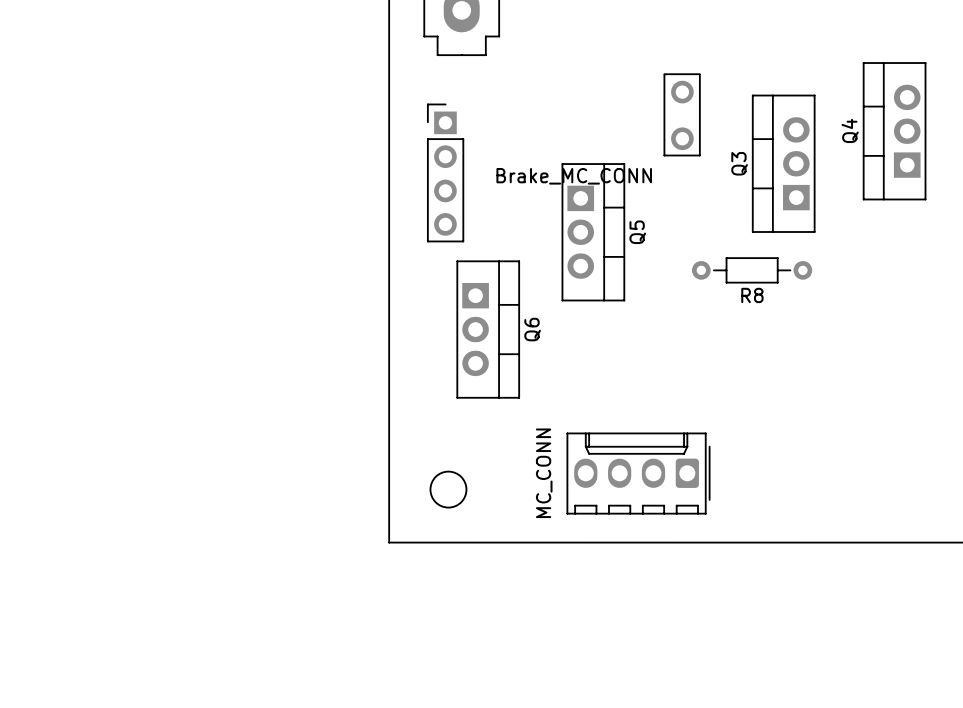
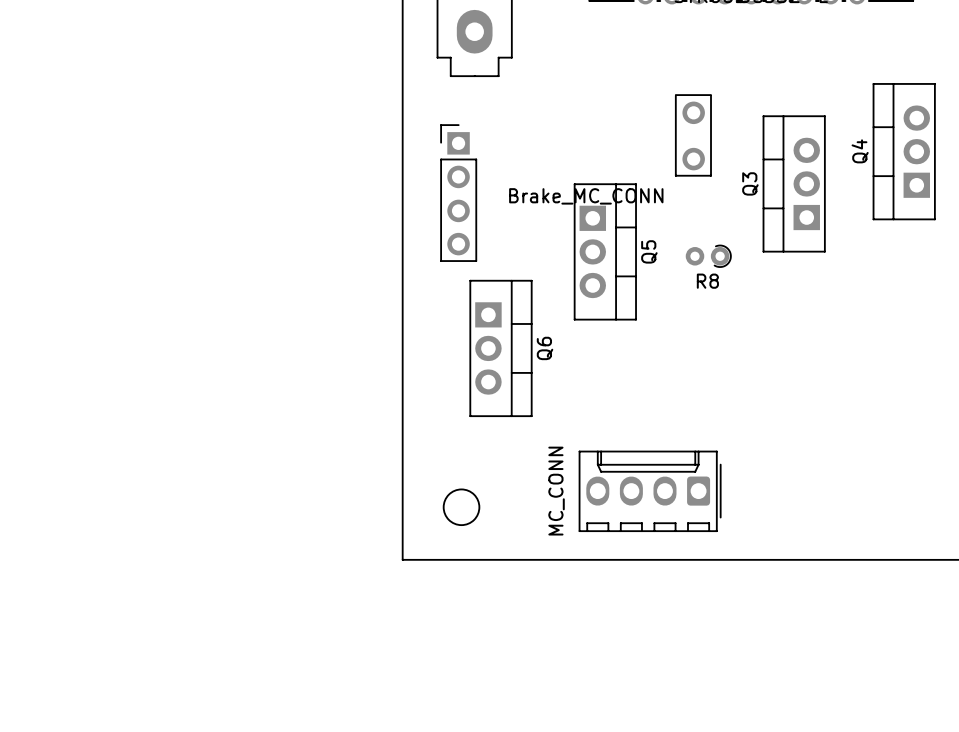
R8 footprint: [692, 257, 813, 284] -> [685, 244, 732, 268]

